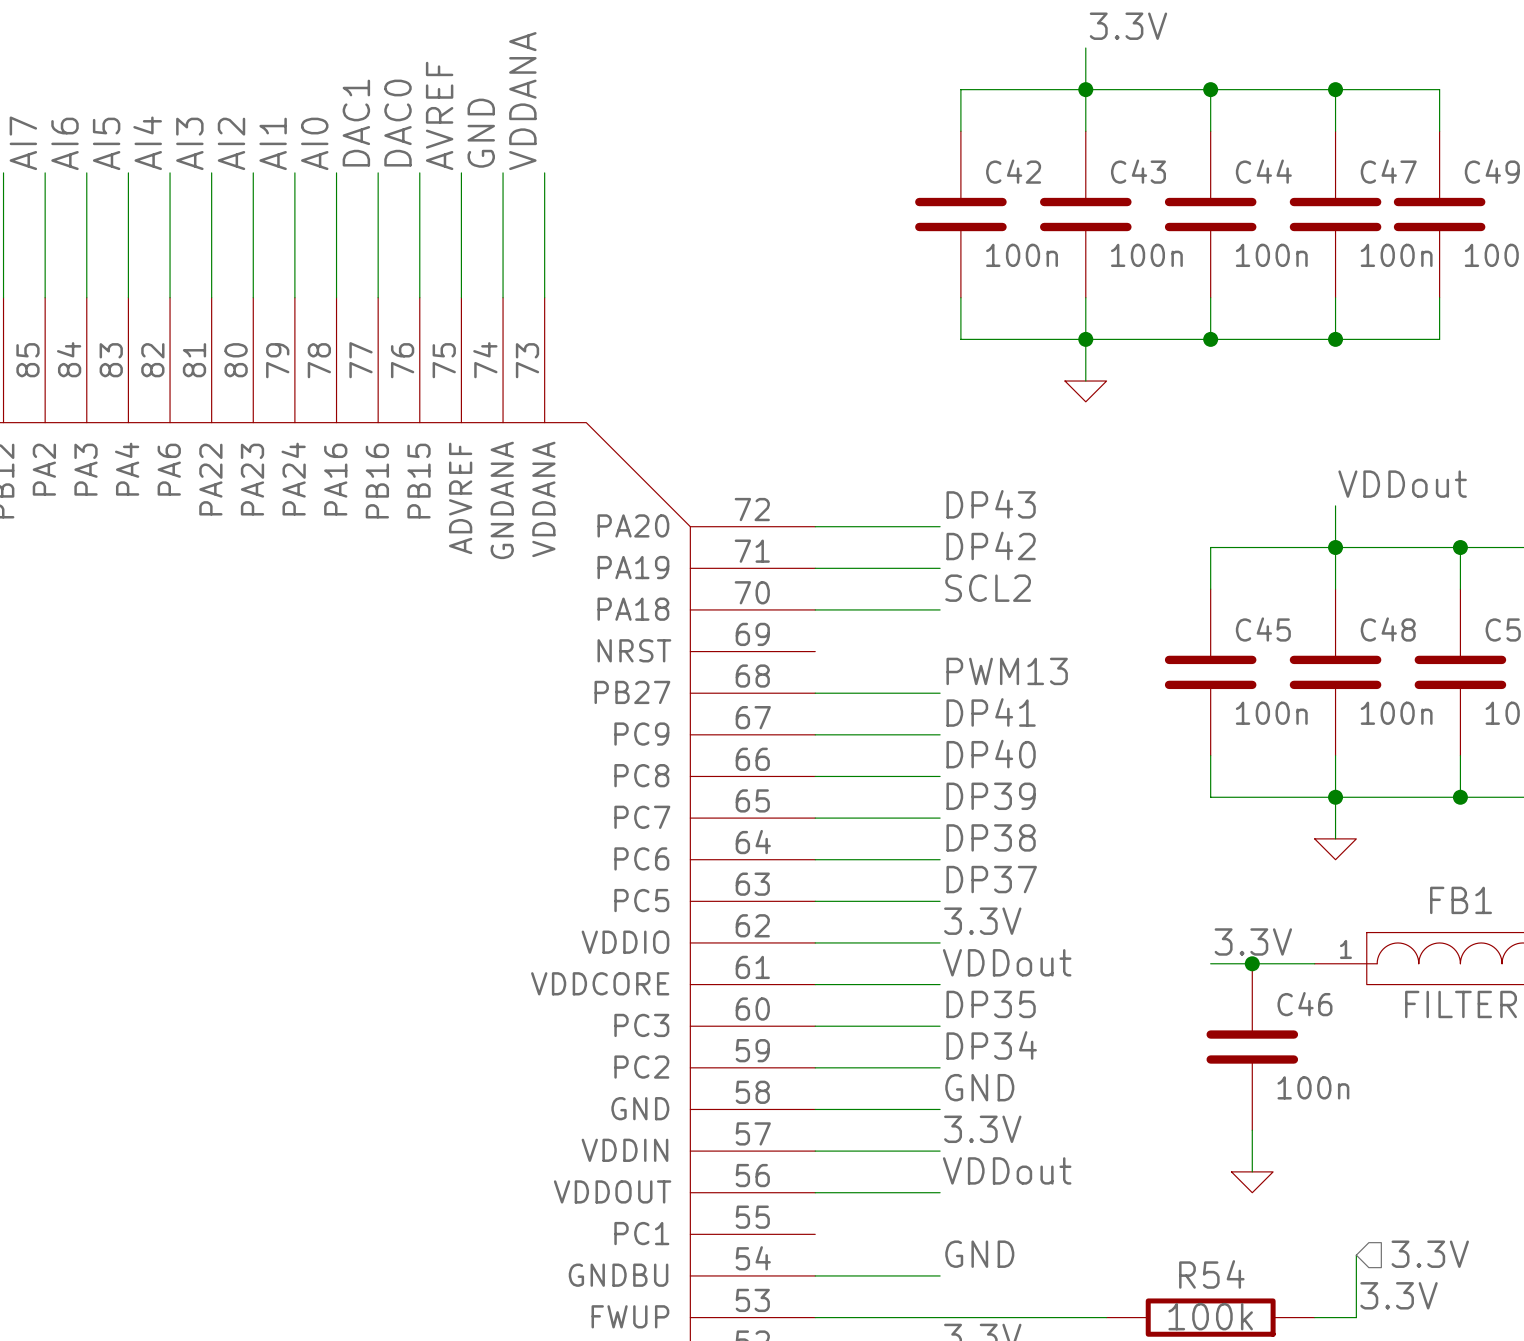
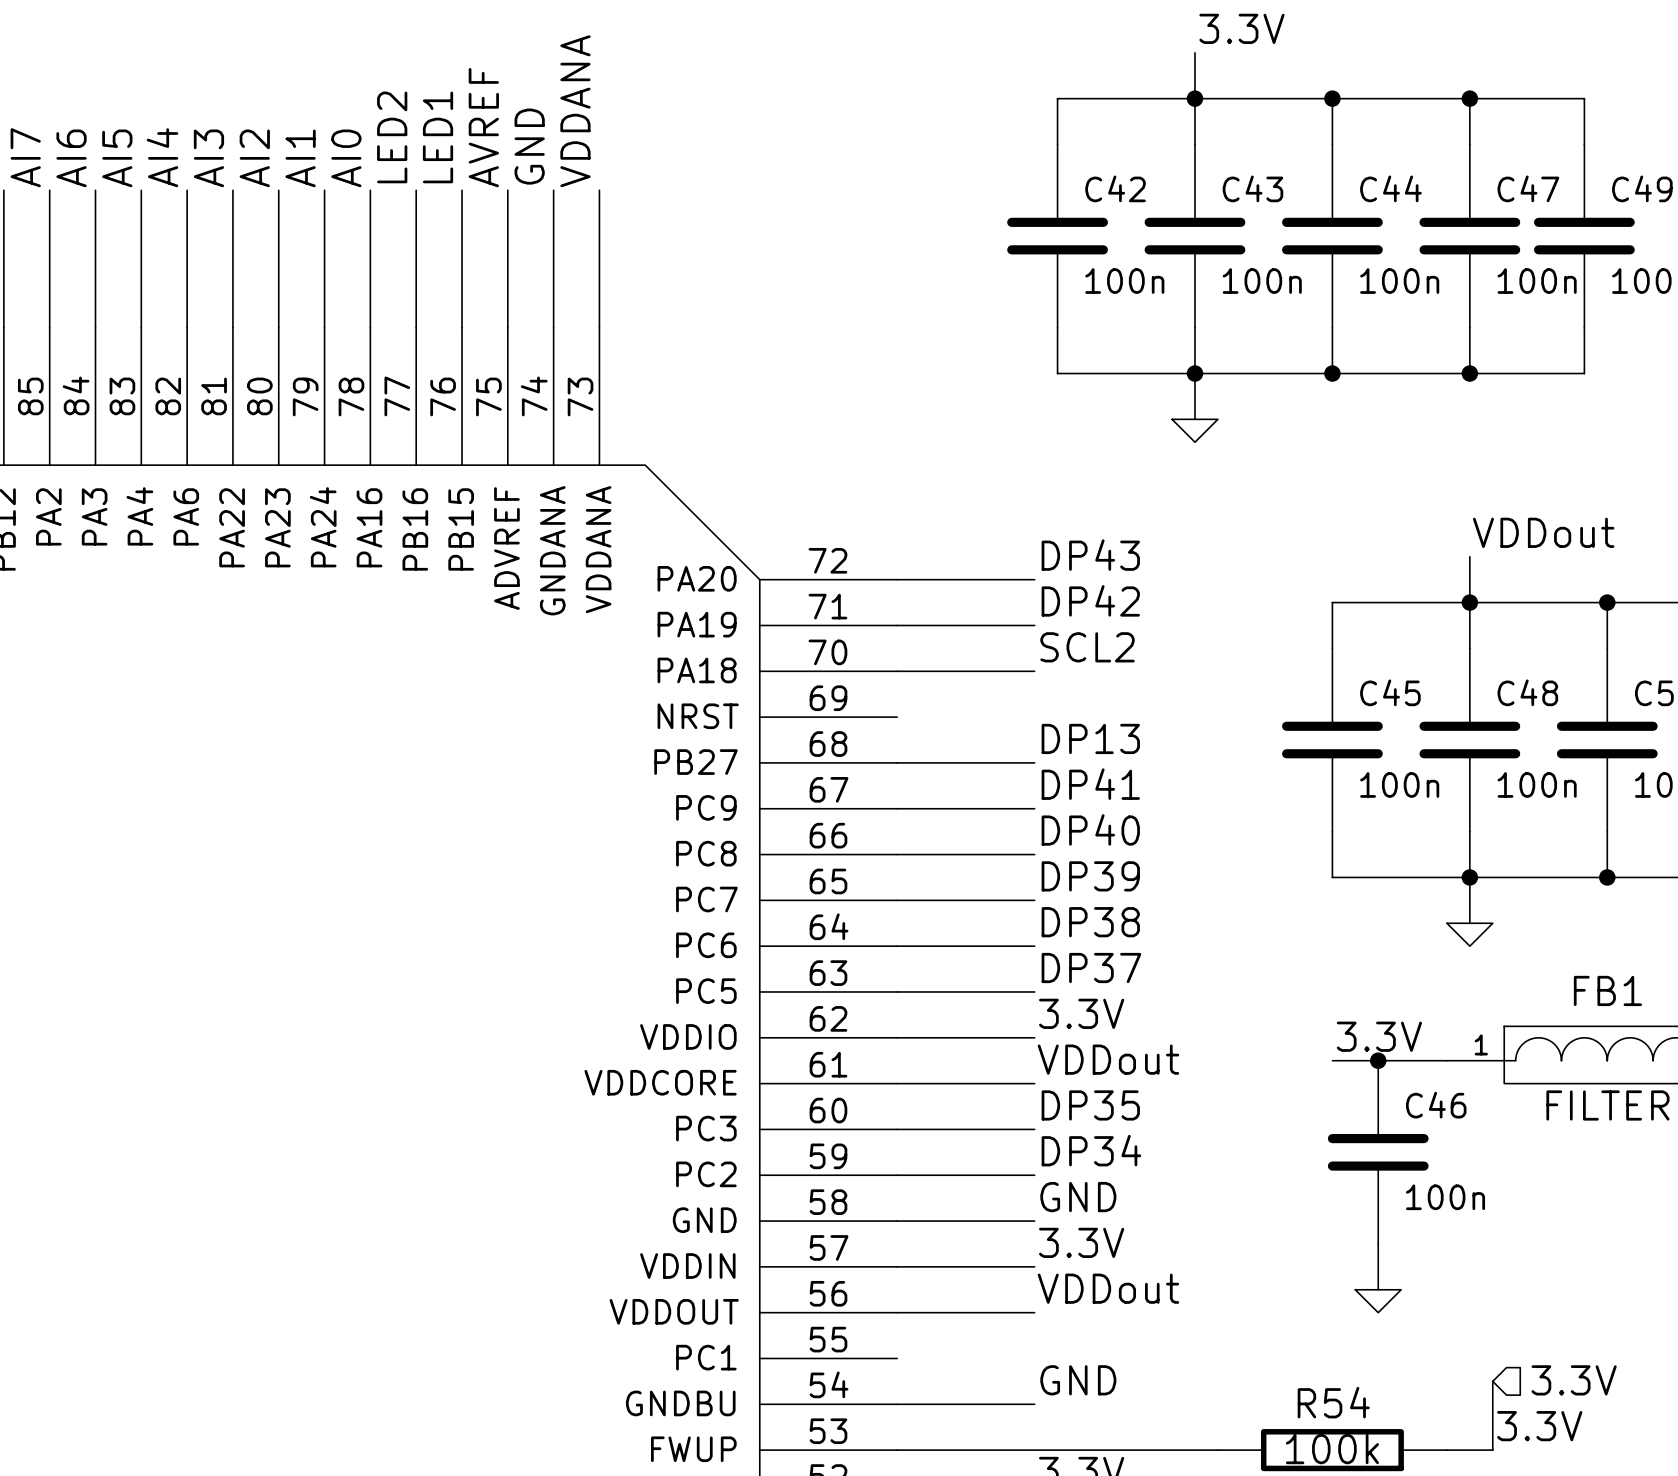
label: DAC1 (356, 123) -> LED2 (392, 137)
label: DAC0 (397, 123) -> LED1 (438, 137)
label: PWM13 (1007, 671) -> DP13 (1090, 738)

